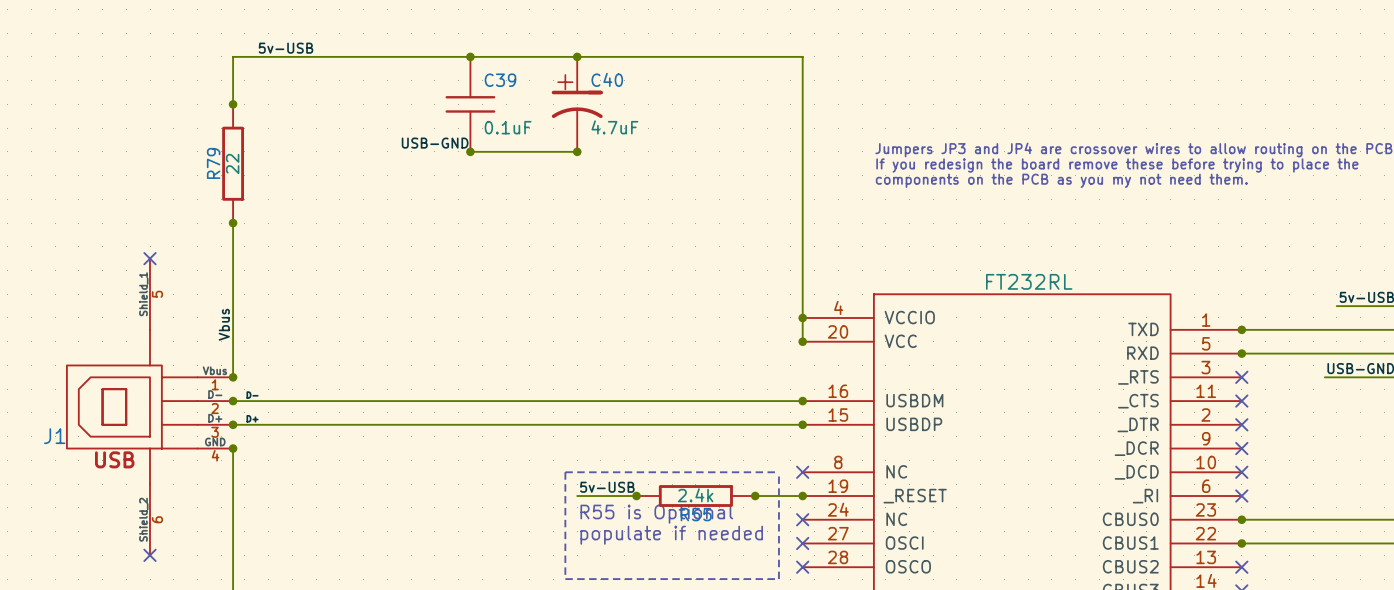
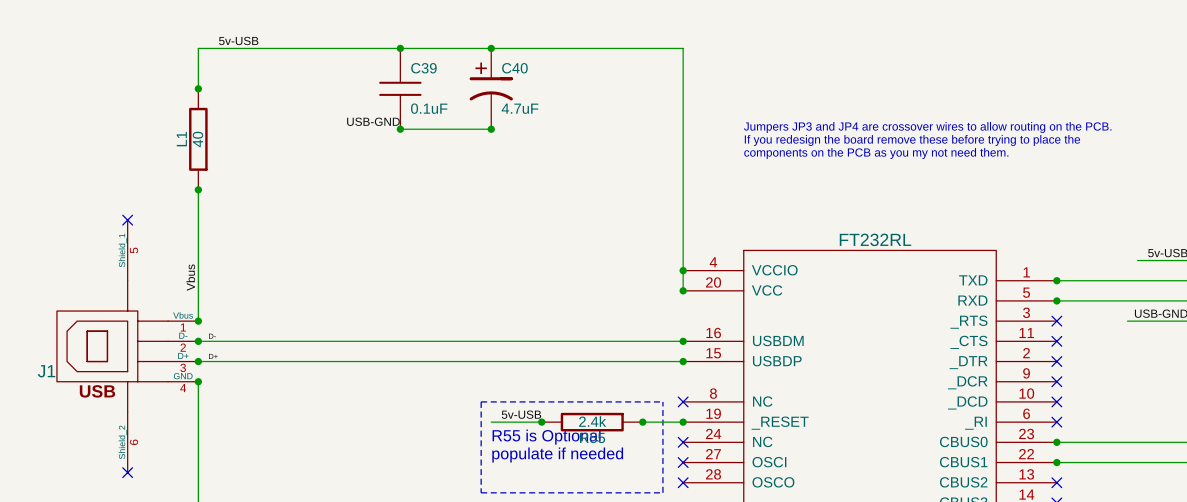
R79 name: R79 (213, 163) -> L1 (181, 139)
R79 value: 22 (232, 164) -> 40 (197, 139)

